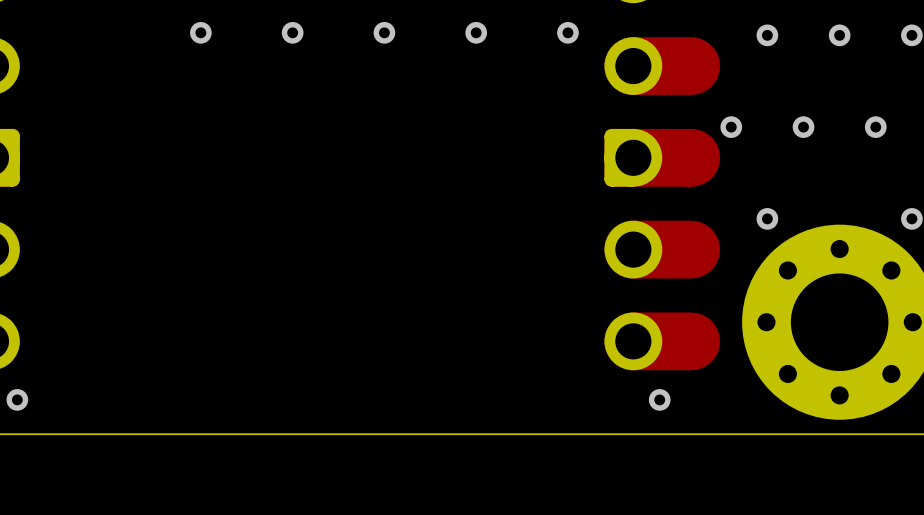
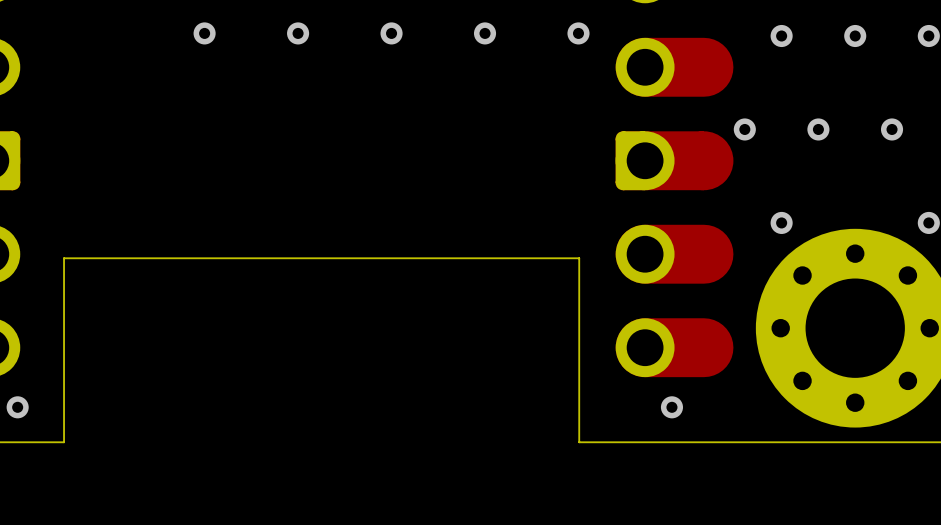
board edge: (568, 434) (62, 434) -> (579, 442) (579, 258) (64, 258) (64, 442)

